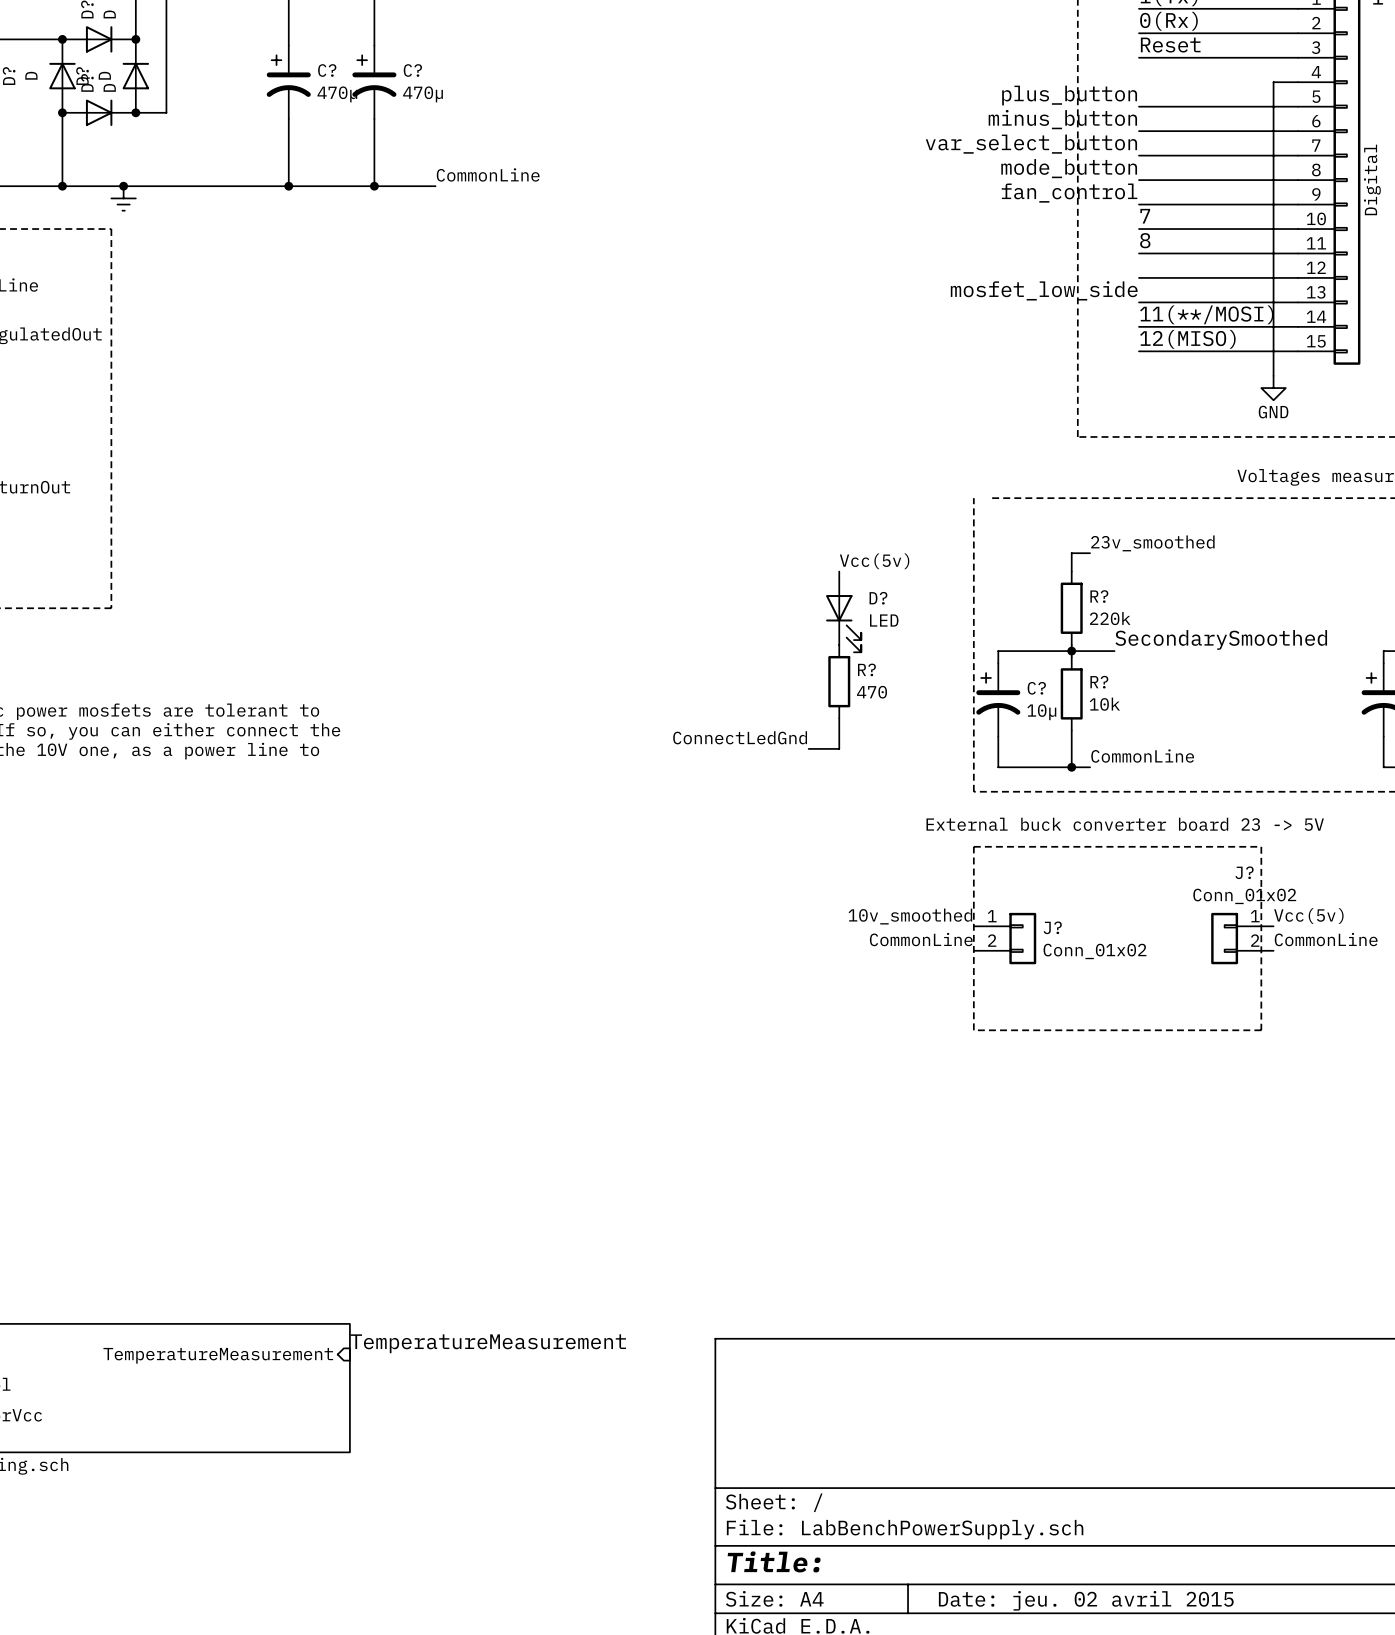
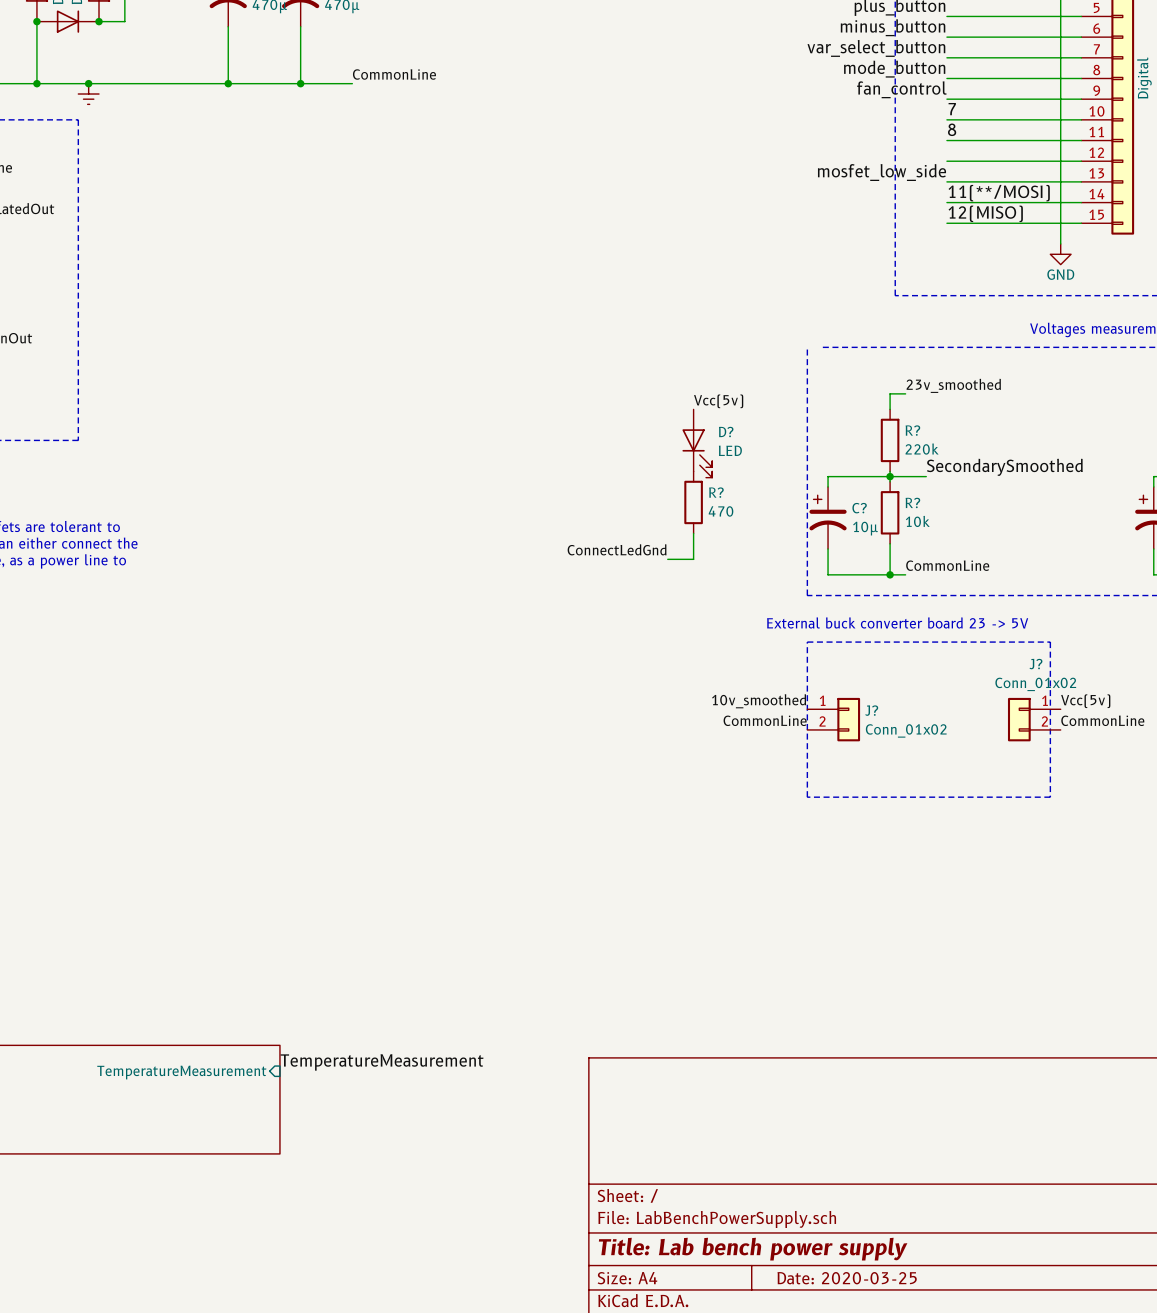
title block: Title: (774, 1561) -> Title: Lab bench power supply (753, 1249)
title block: Date: jeu. 02 avril 2015 (1086, 1600) -> Date: 2020-03-25 (847, 1278)

